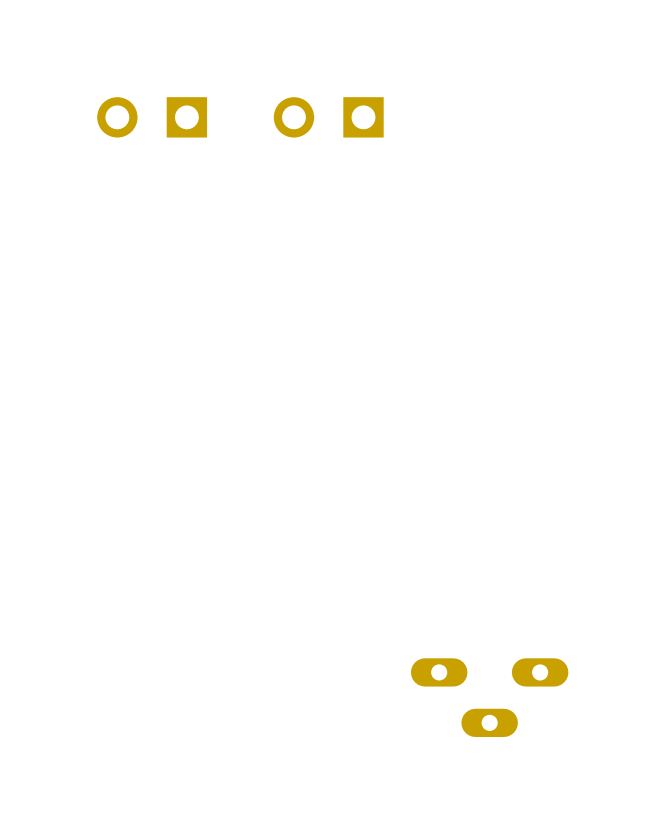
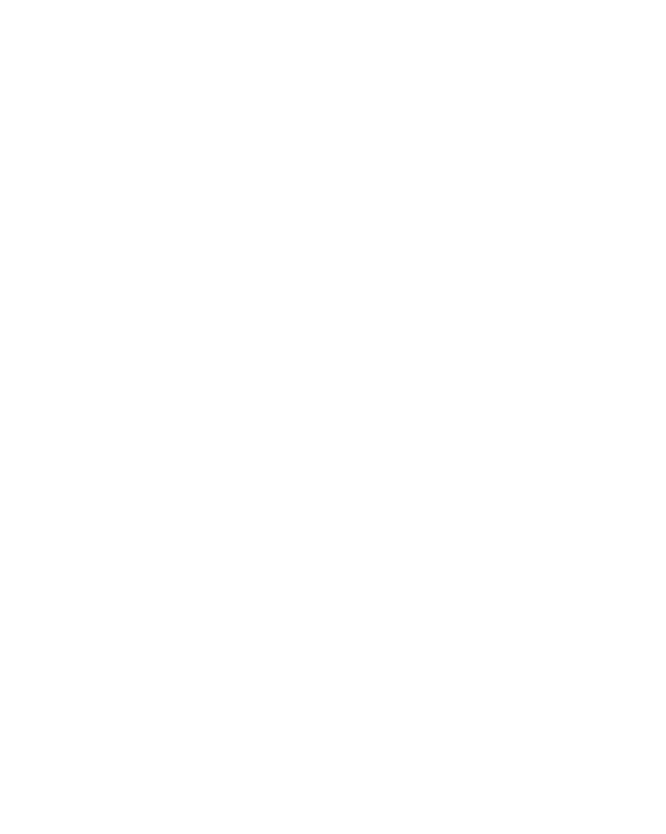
part: (152, 117) -> none
part: (328, 117) -> none
part: (489, 697) -> none

